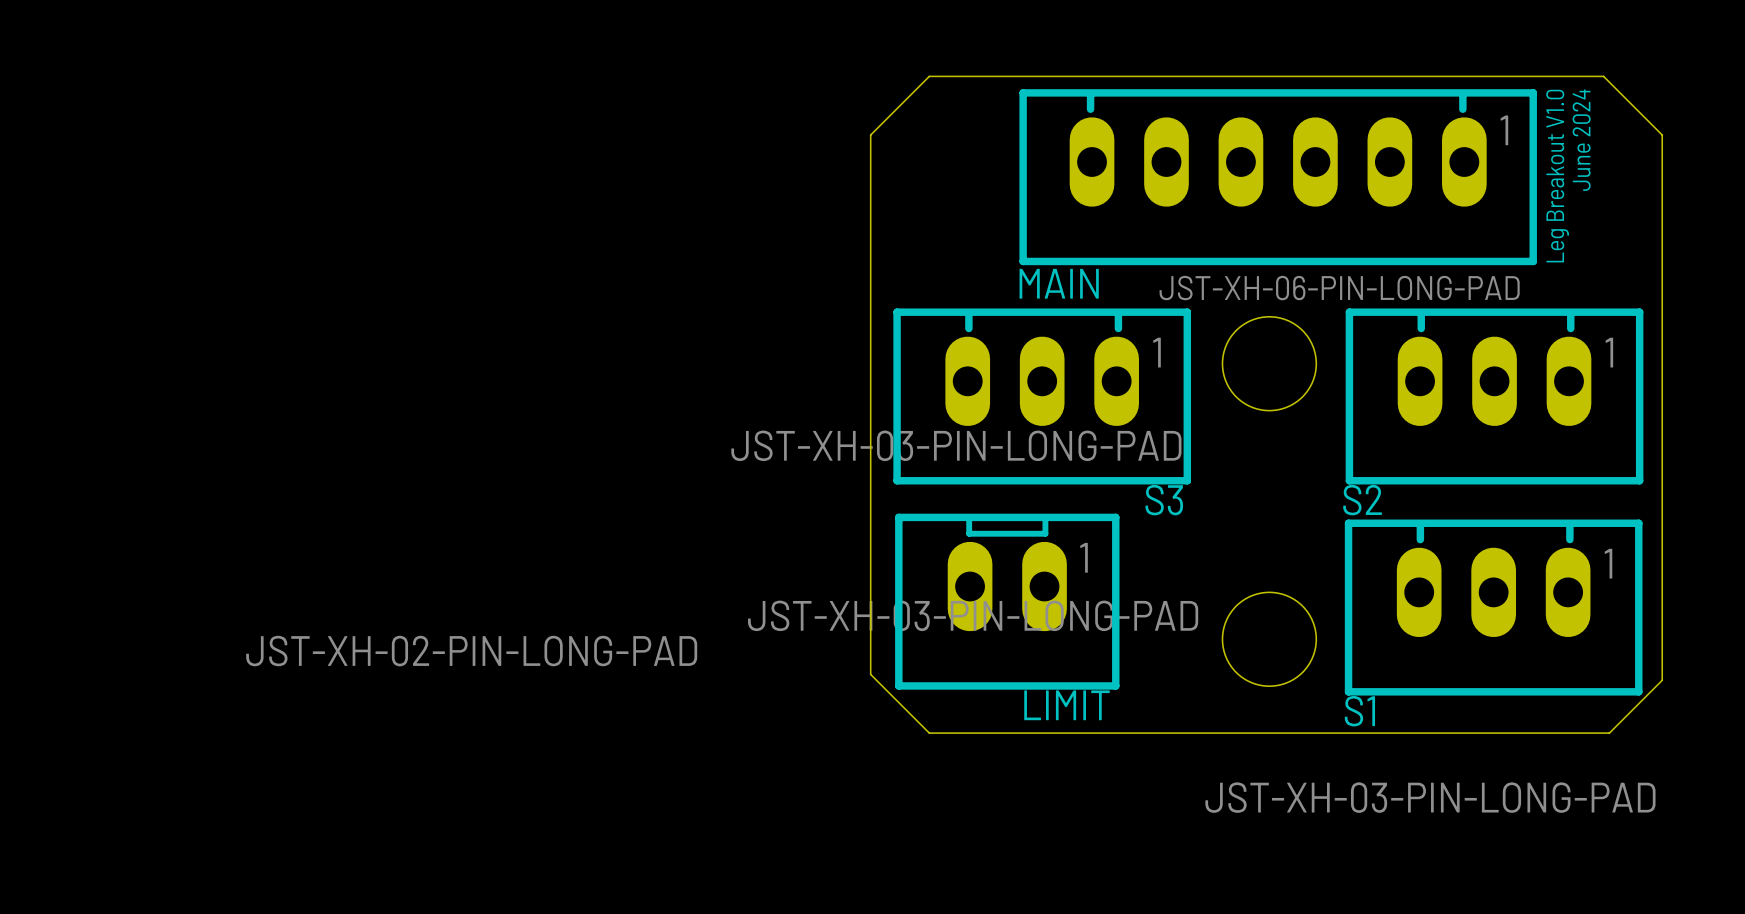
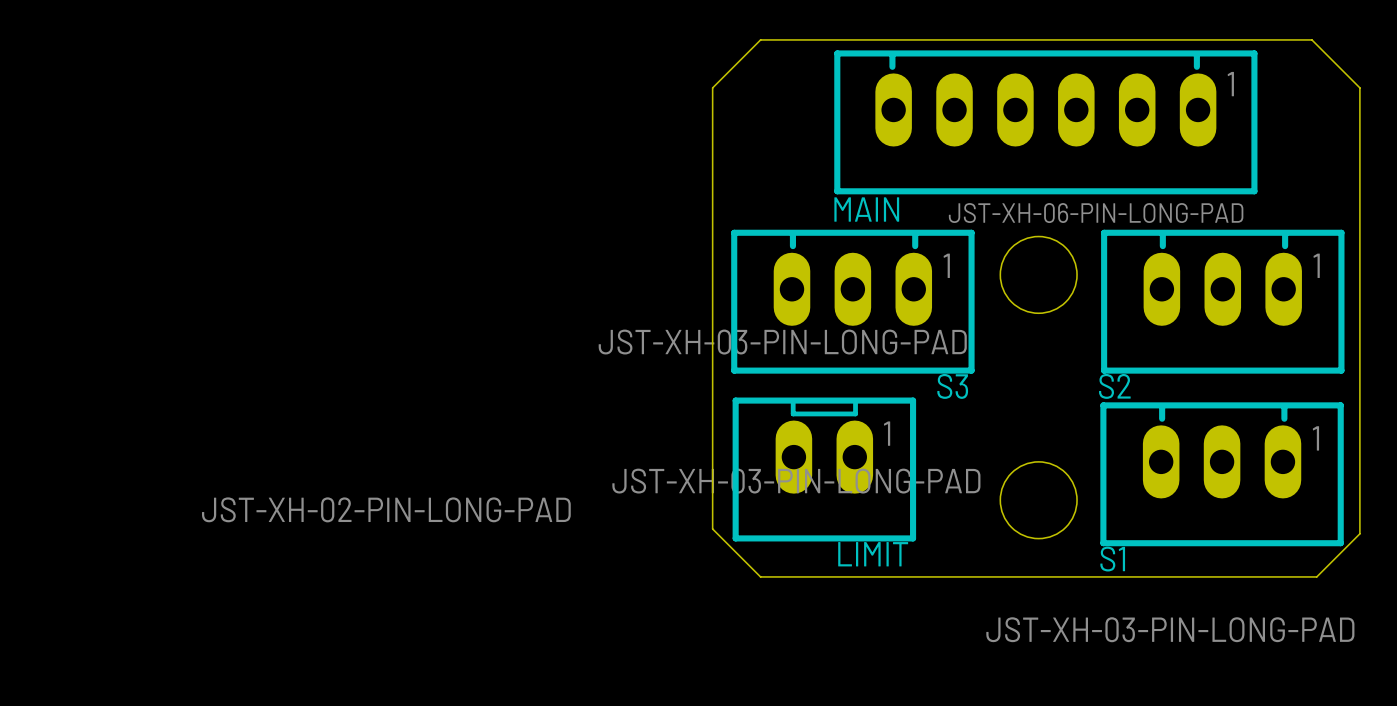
text: June 2024 (1581, 140) -> none
text: Leg Breakout V1.0 (1557, 176) -> none

